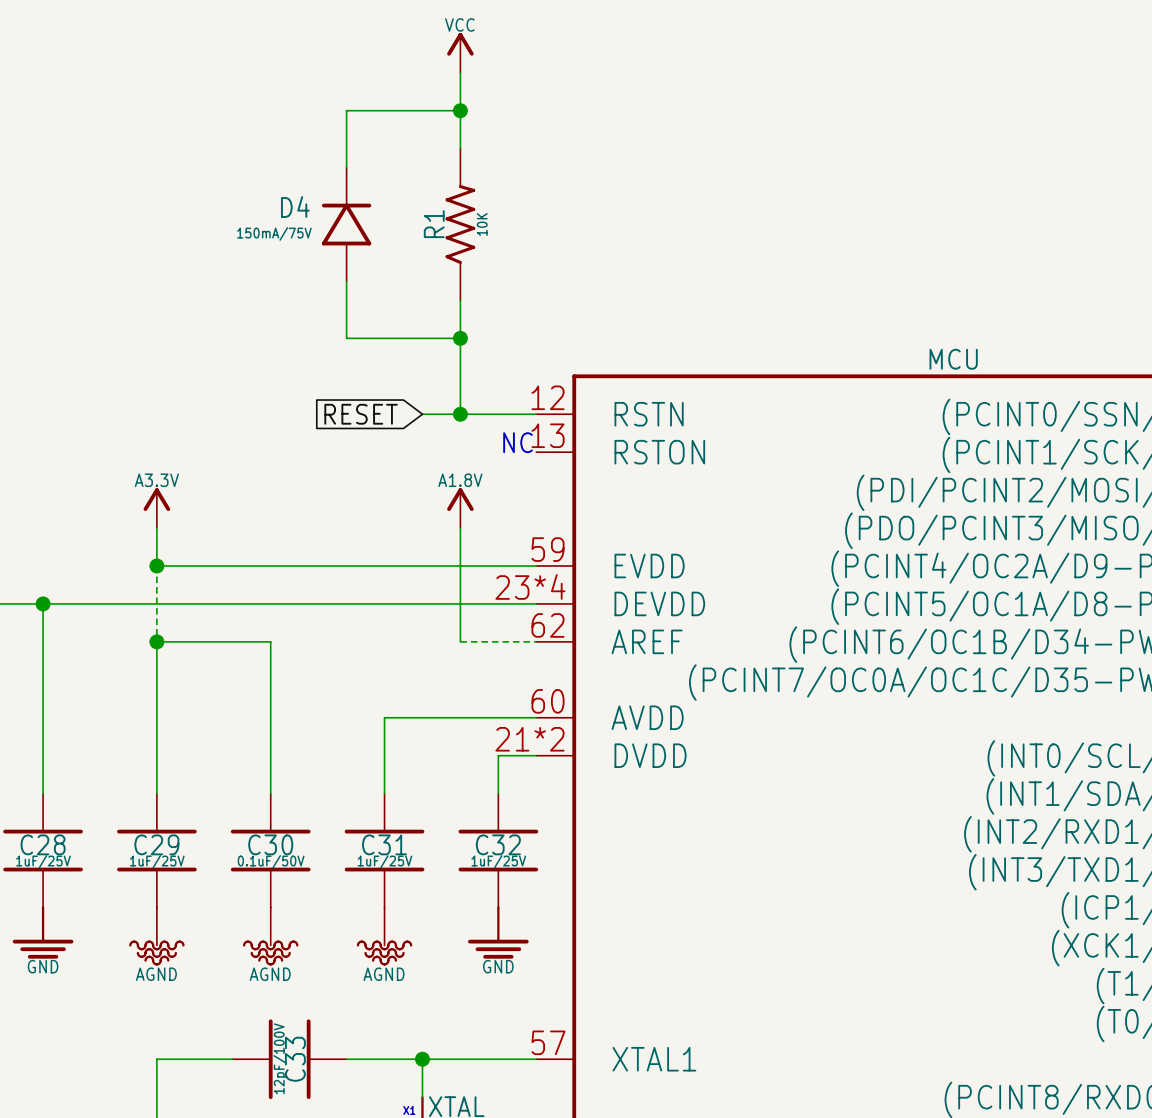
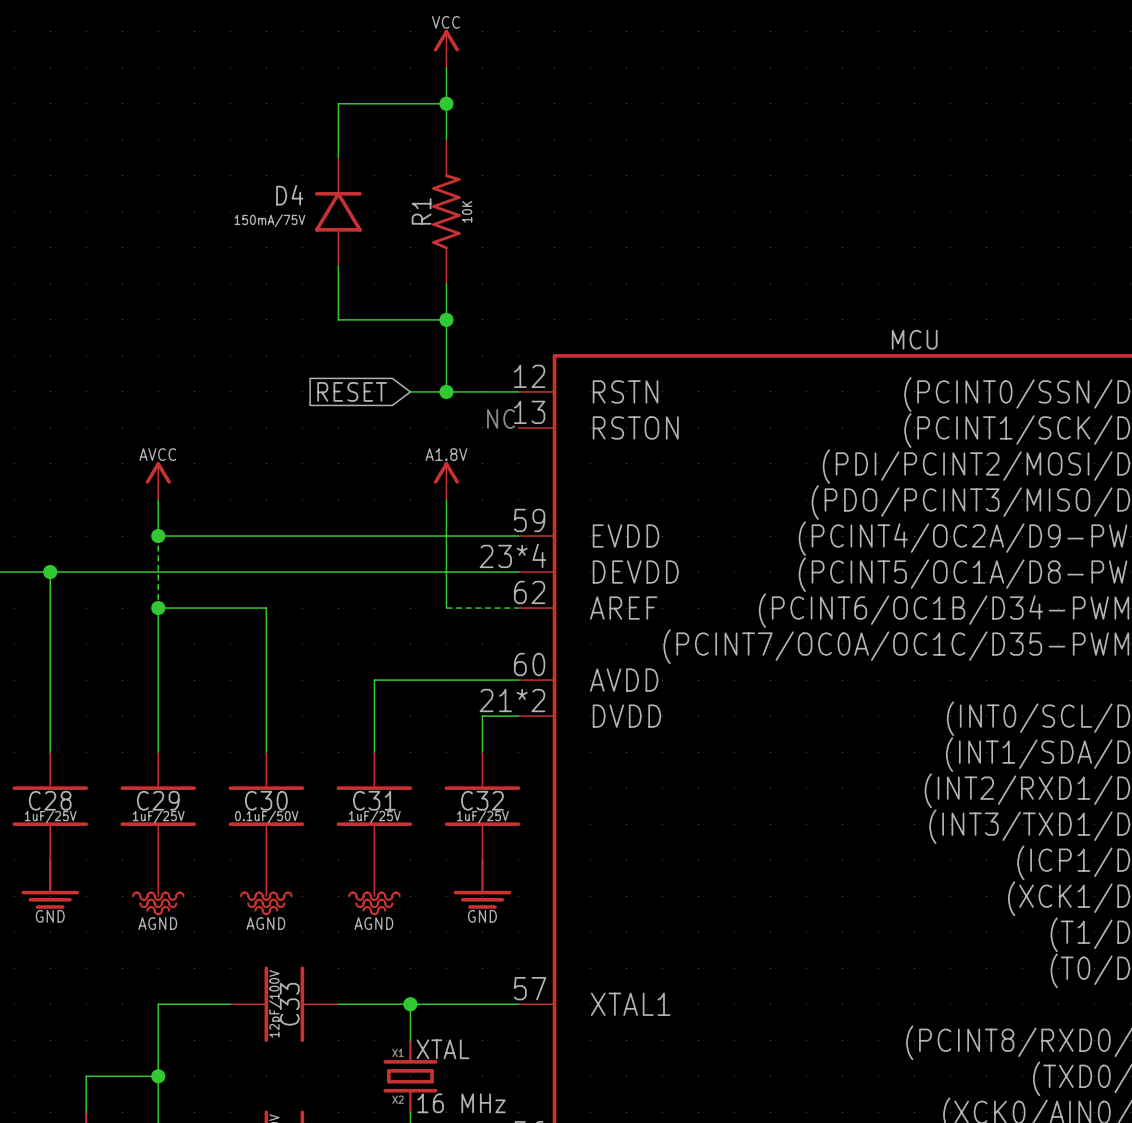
power symbol text: A3.3V (156, 480) -> AVCC (157, 454)

